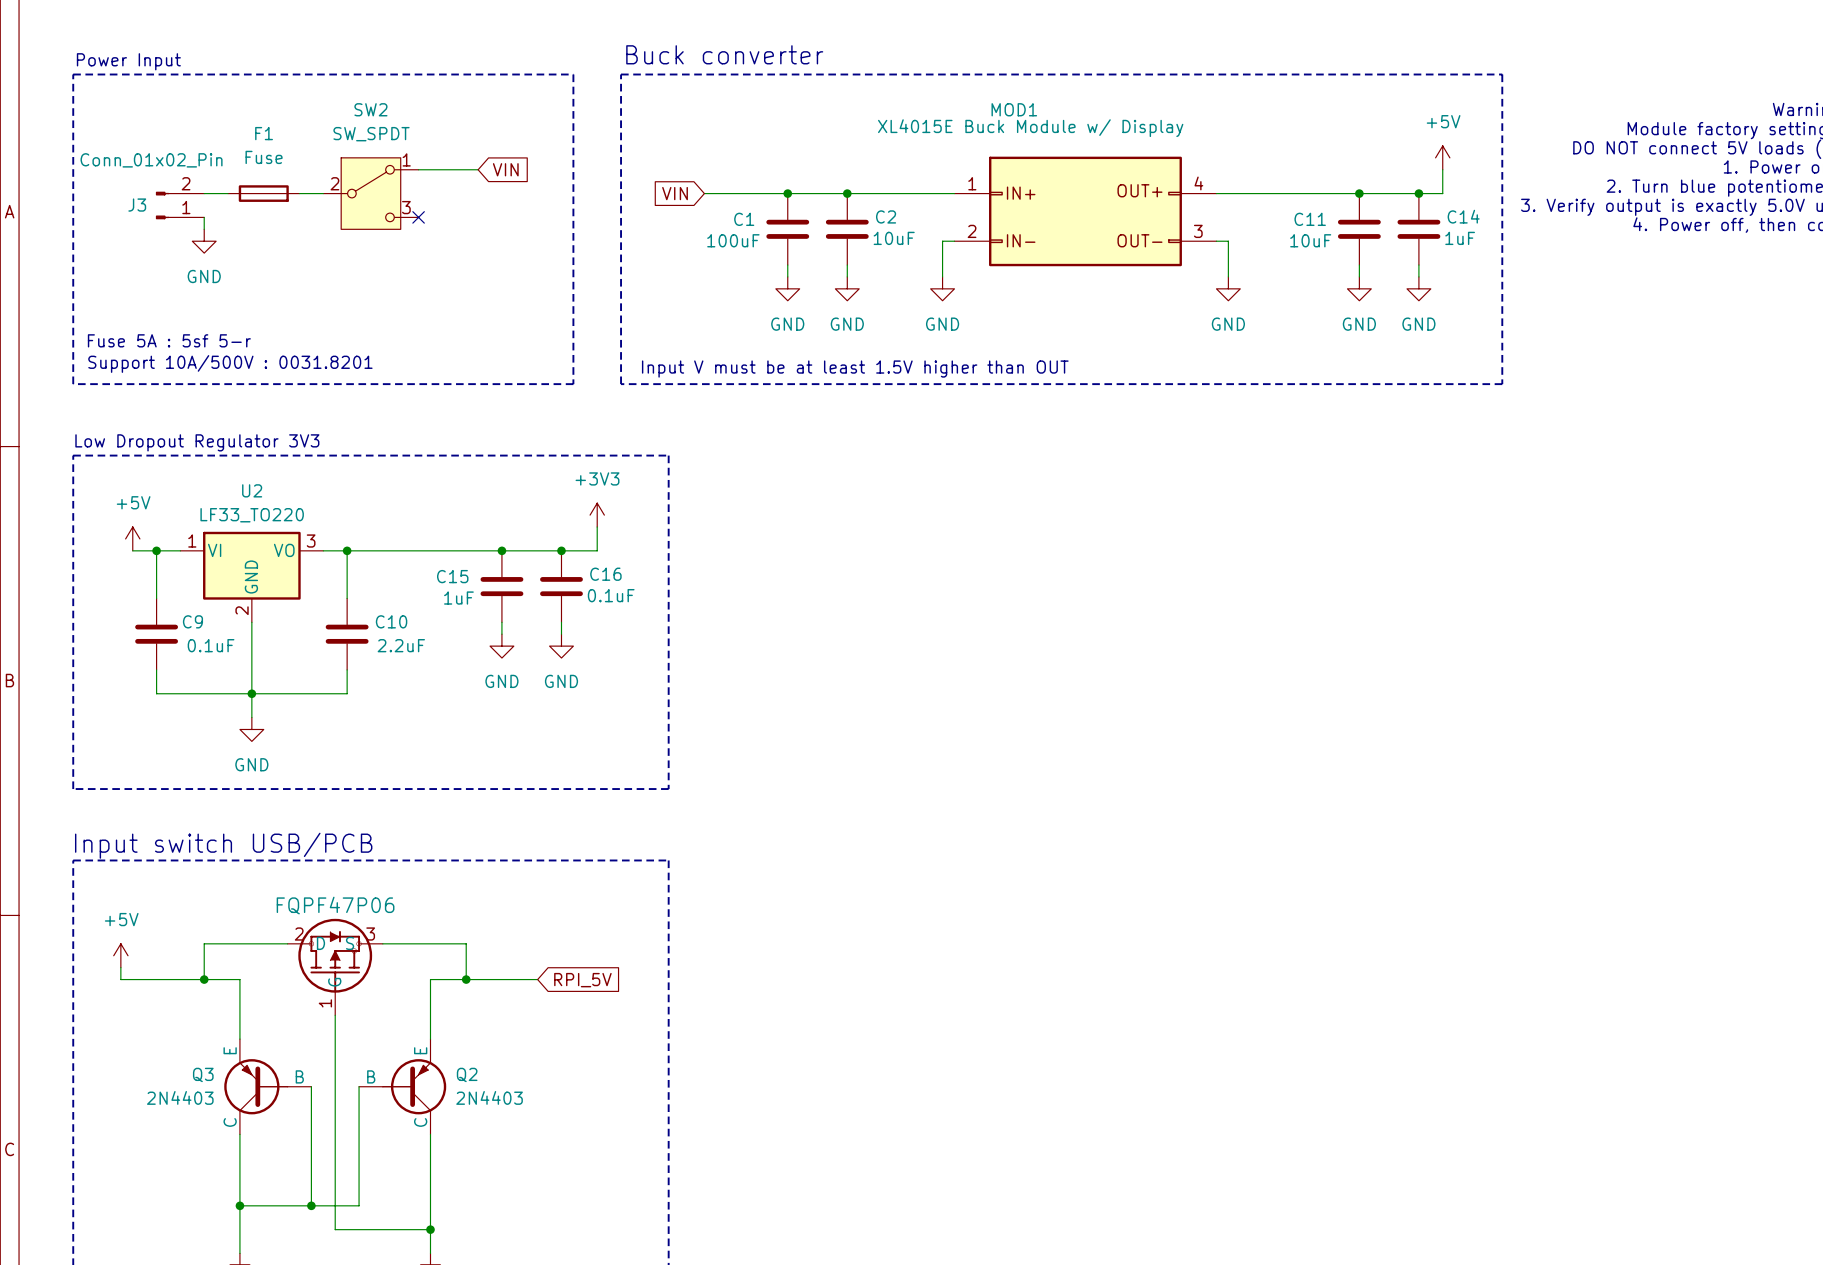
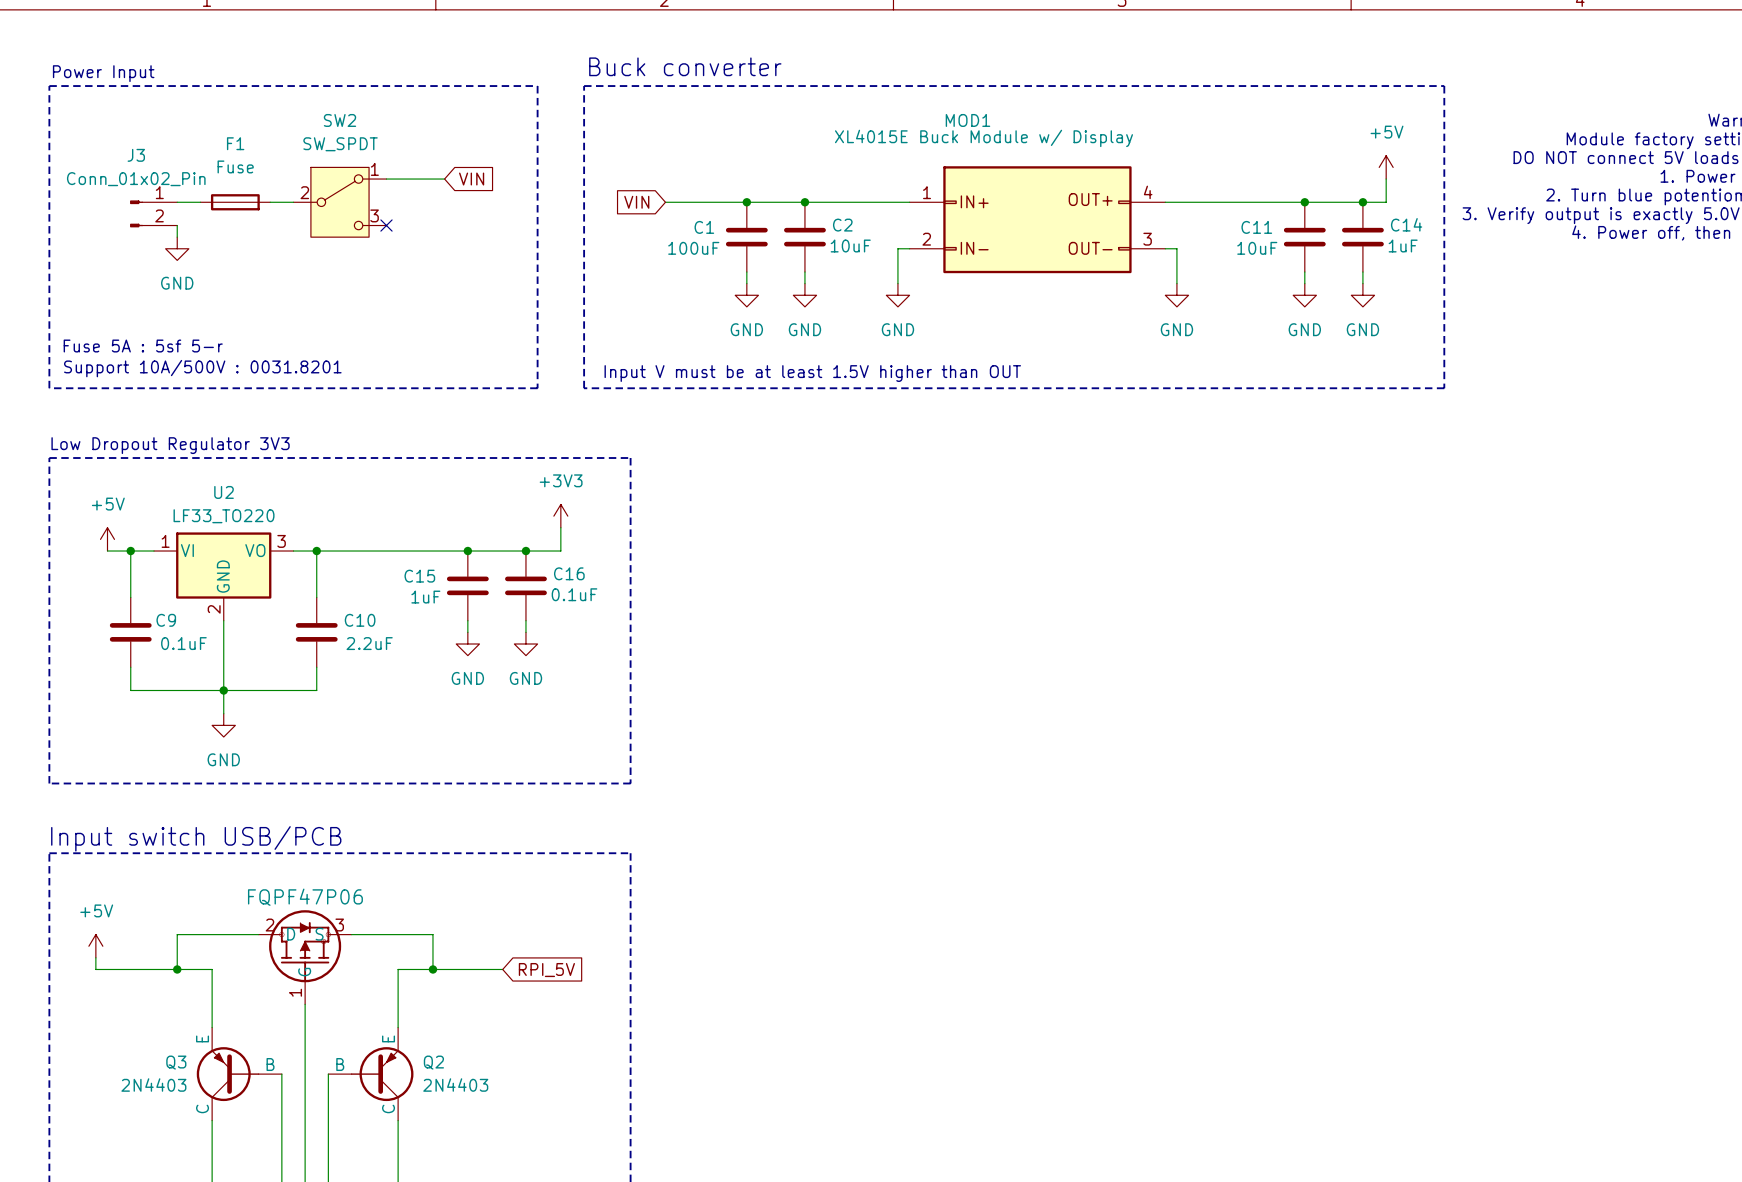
J3 name position: J3 (137, 205) -> J3 (136, 155)
J3 flip: as is (162, 205) -> up-down (136, 213)

